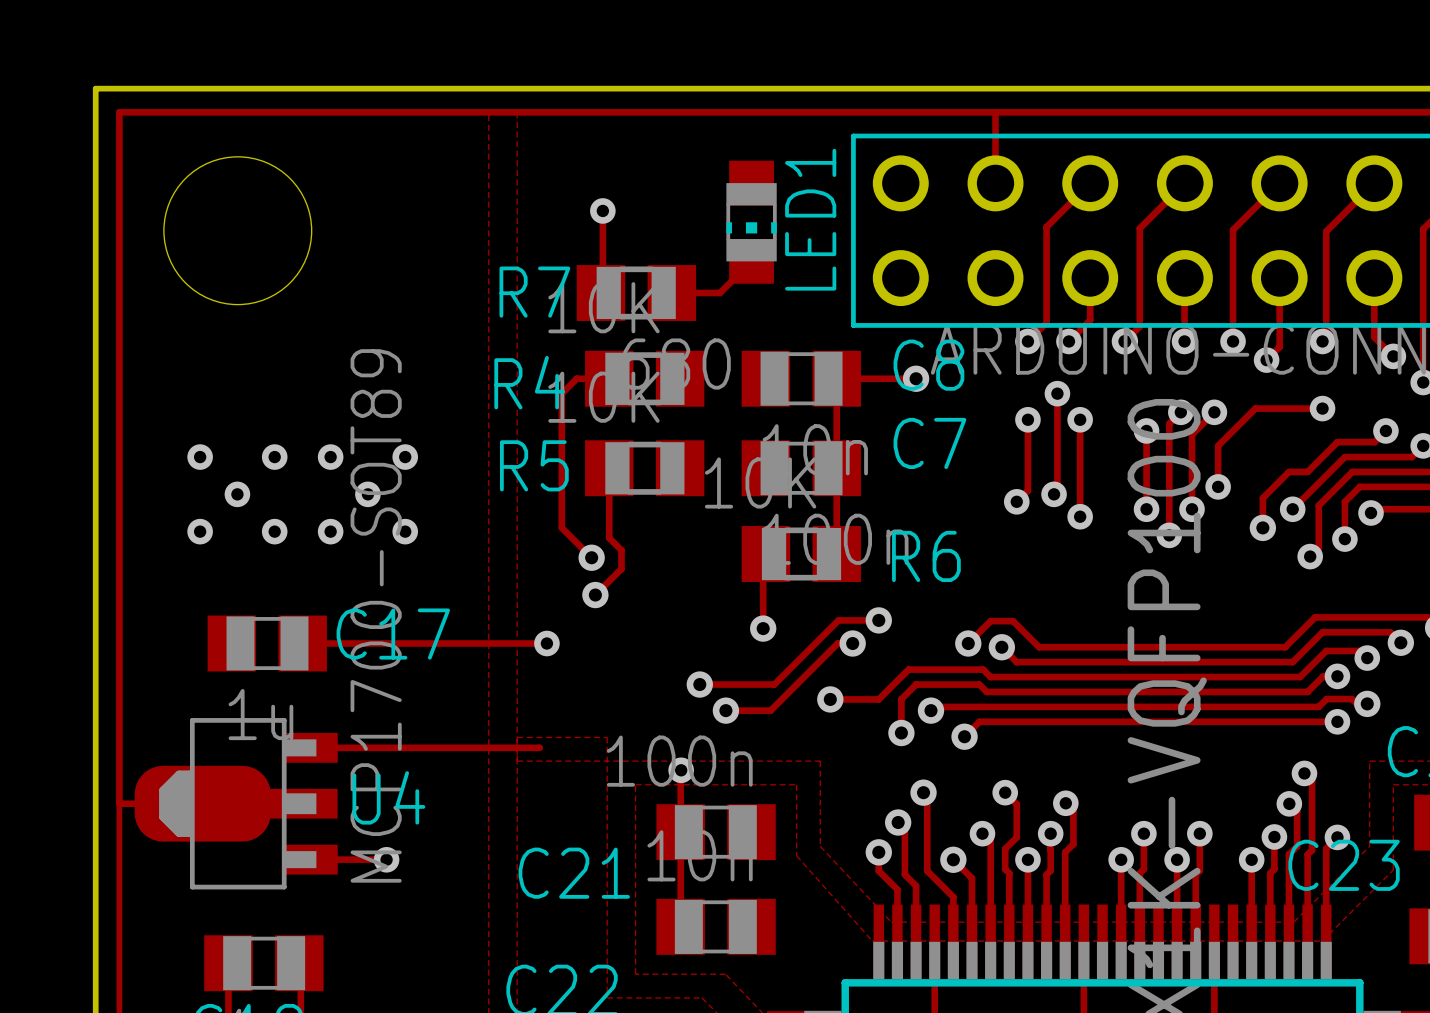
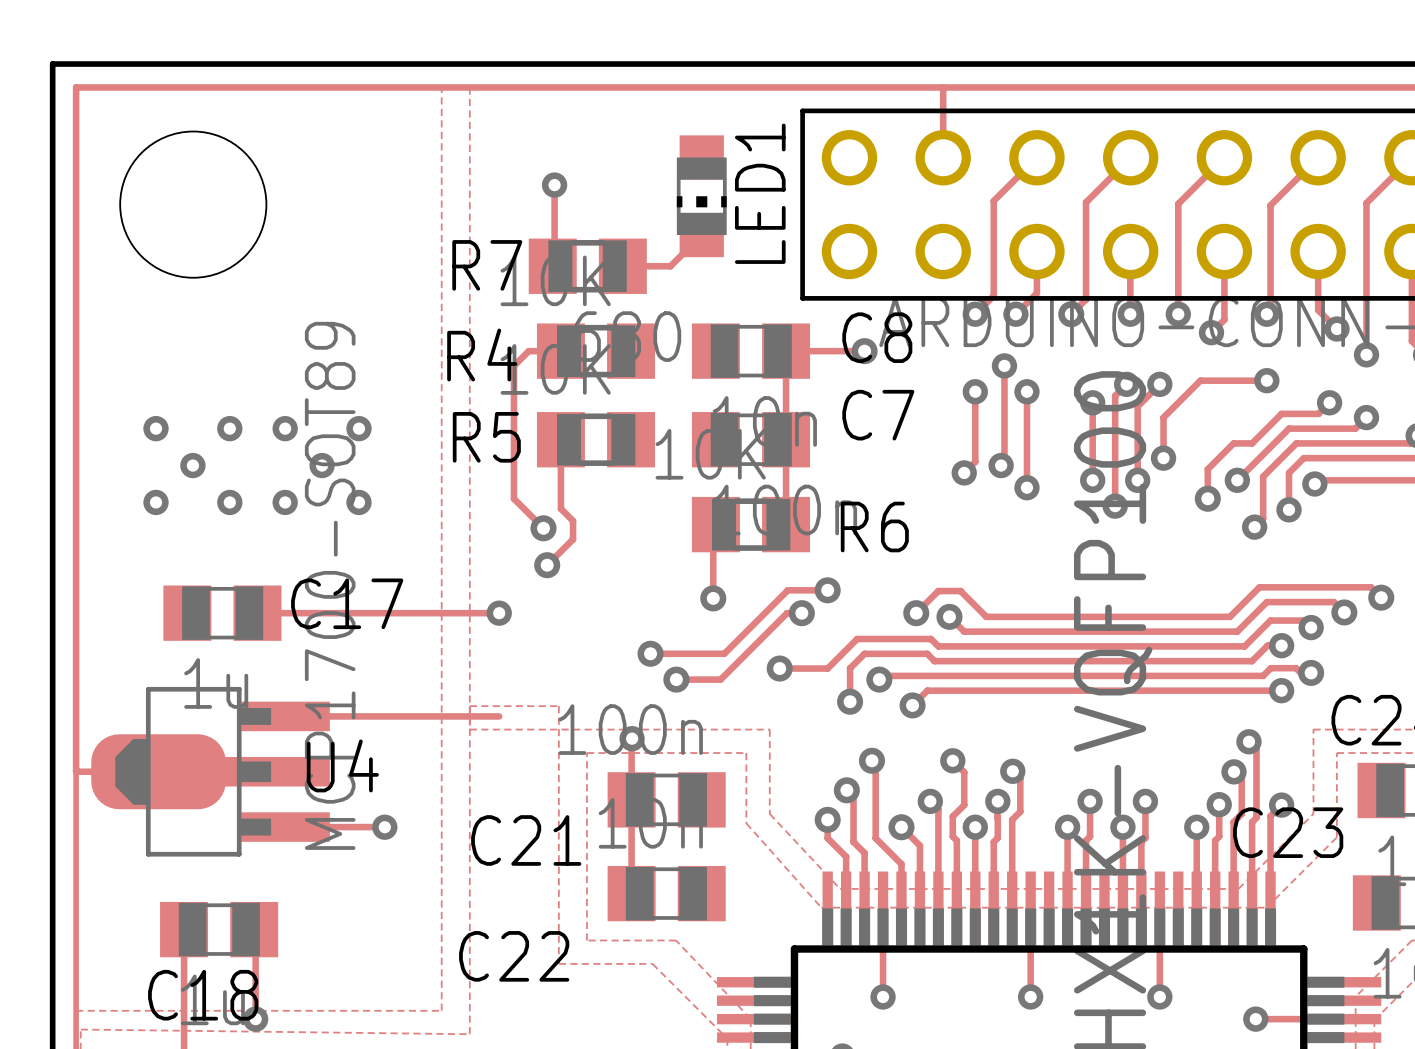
U4 footprint: [134, 718, 338, 890] -> [91, 686, 330, 857]
track: none -> (491, 716) (499, 716)
track: none -> (340, 827) (384, 827)
via position: (386, 859) -> (384, 827)

